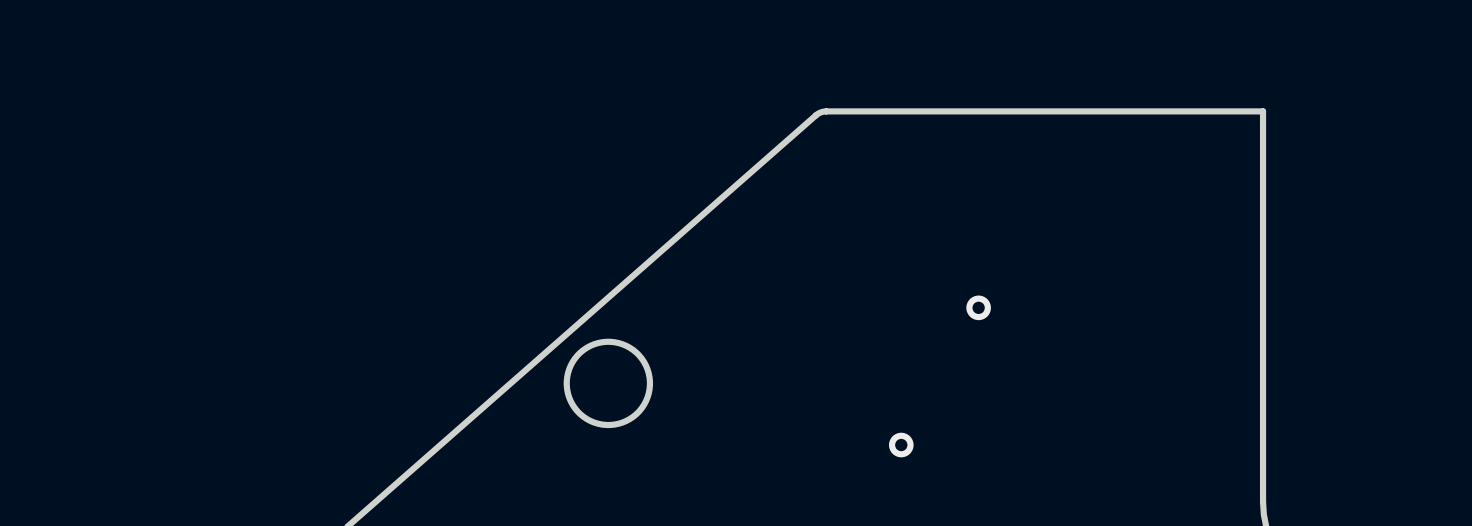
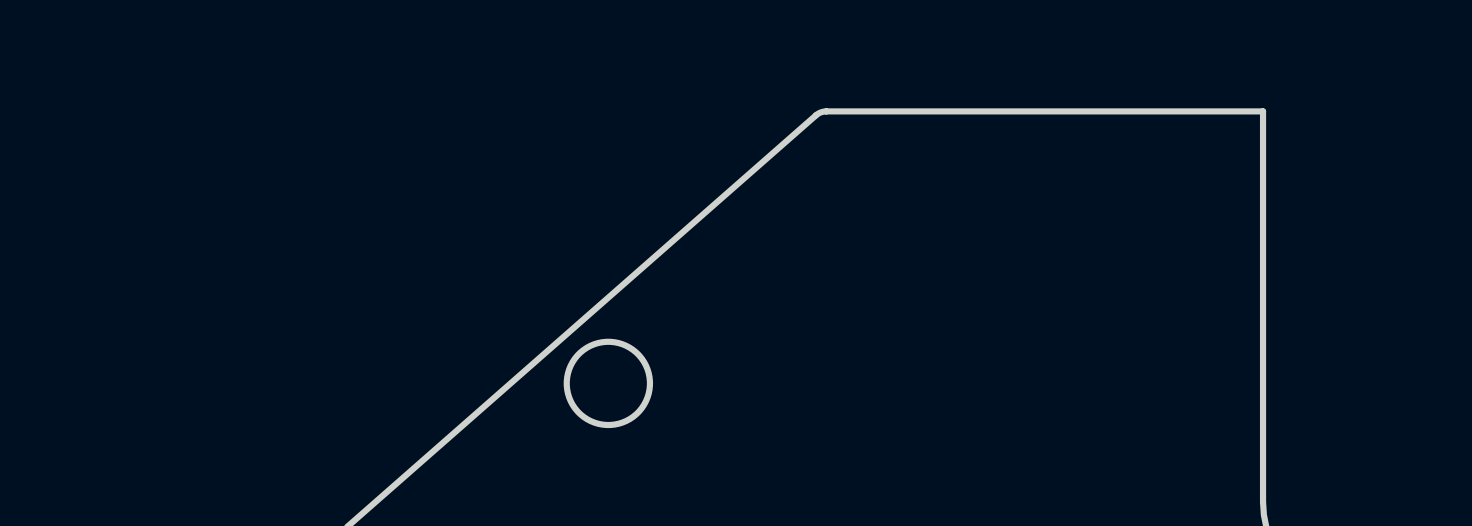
via: (978, 307) -> none
via: (901, 445) -> none

